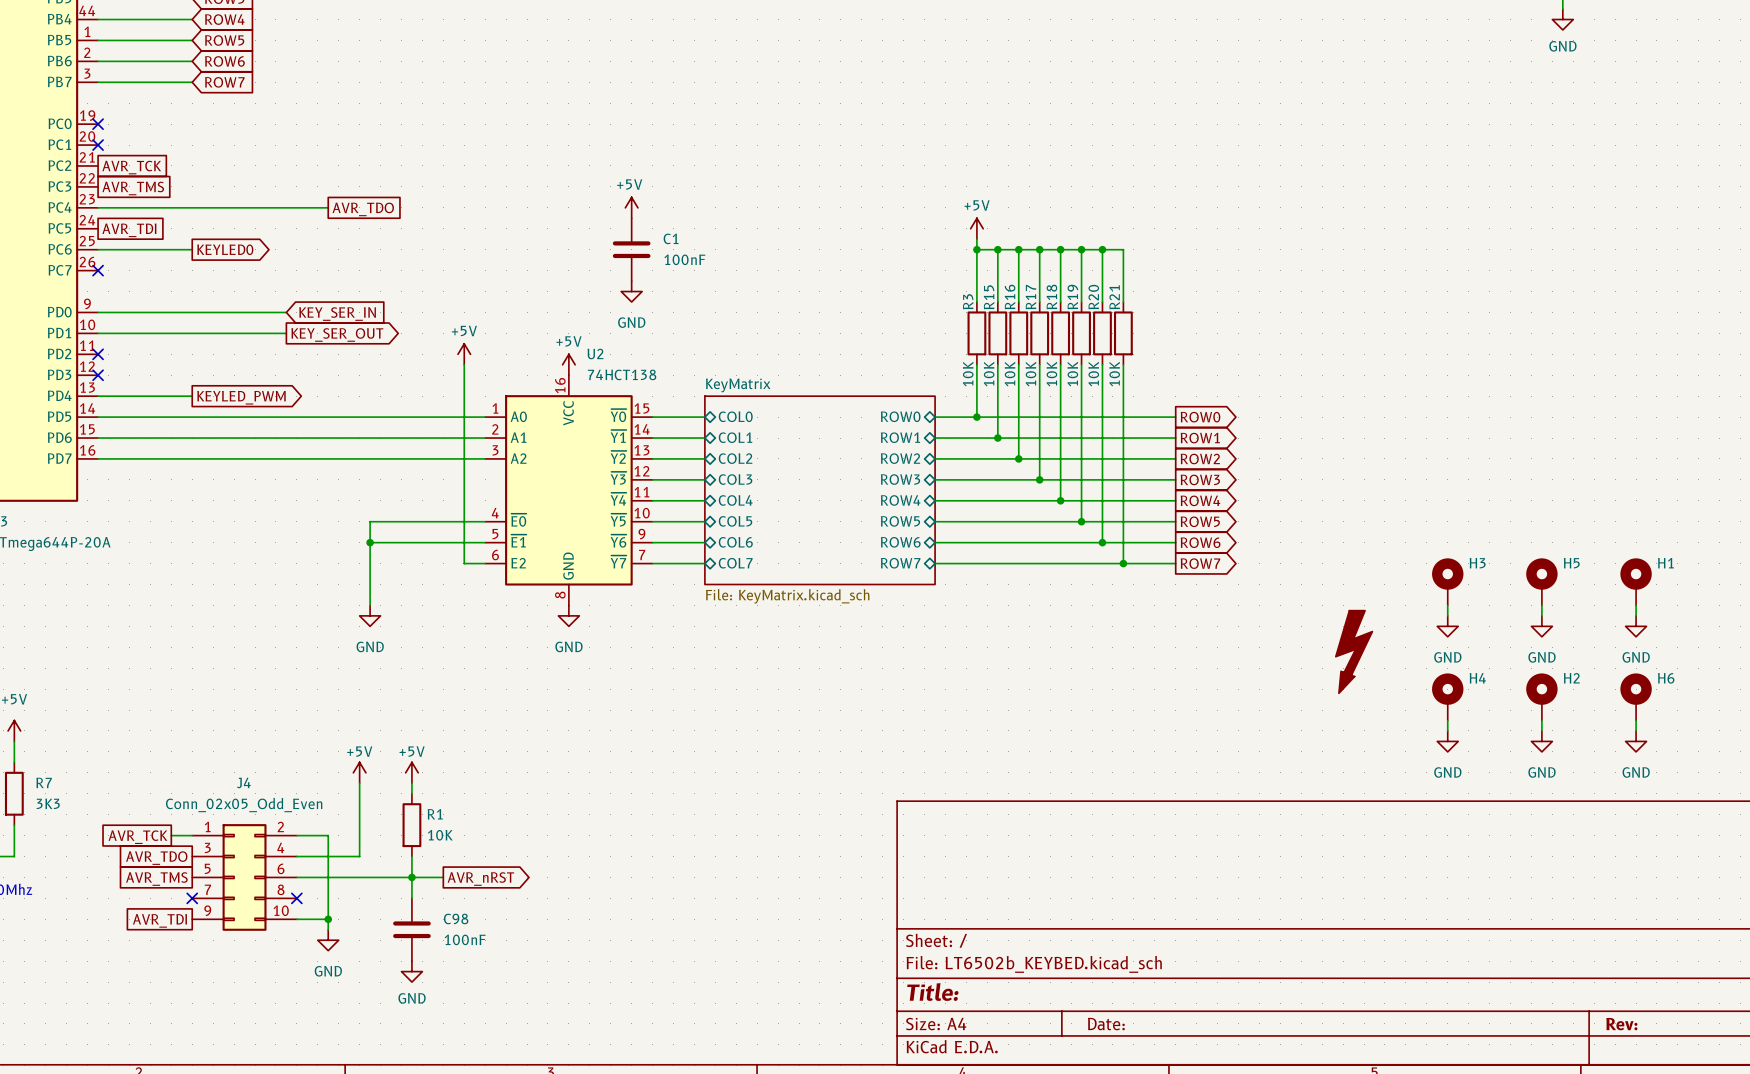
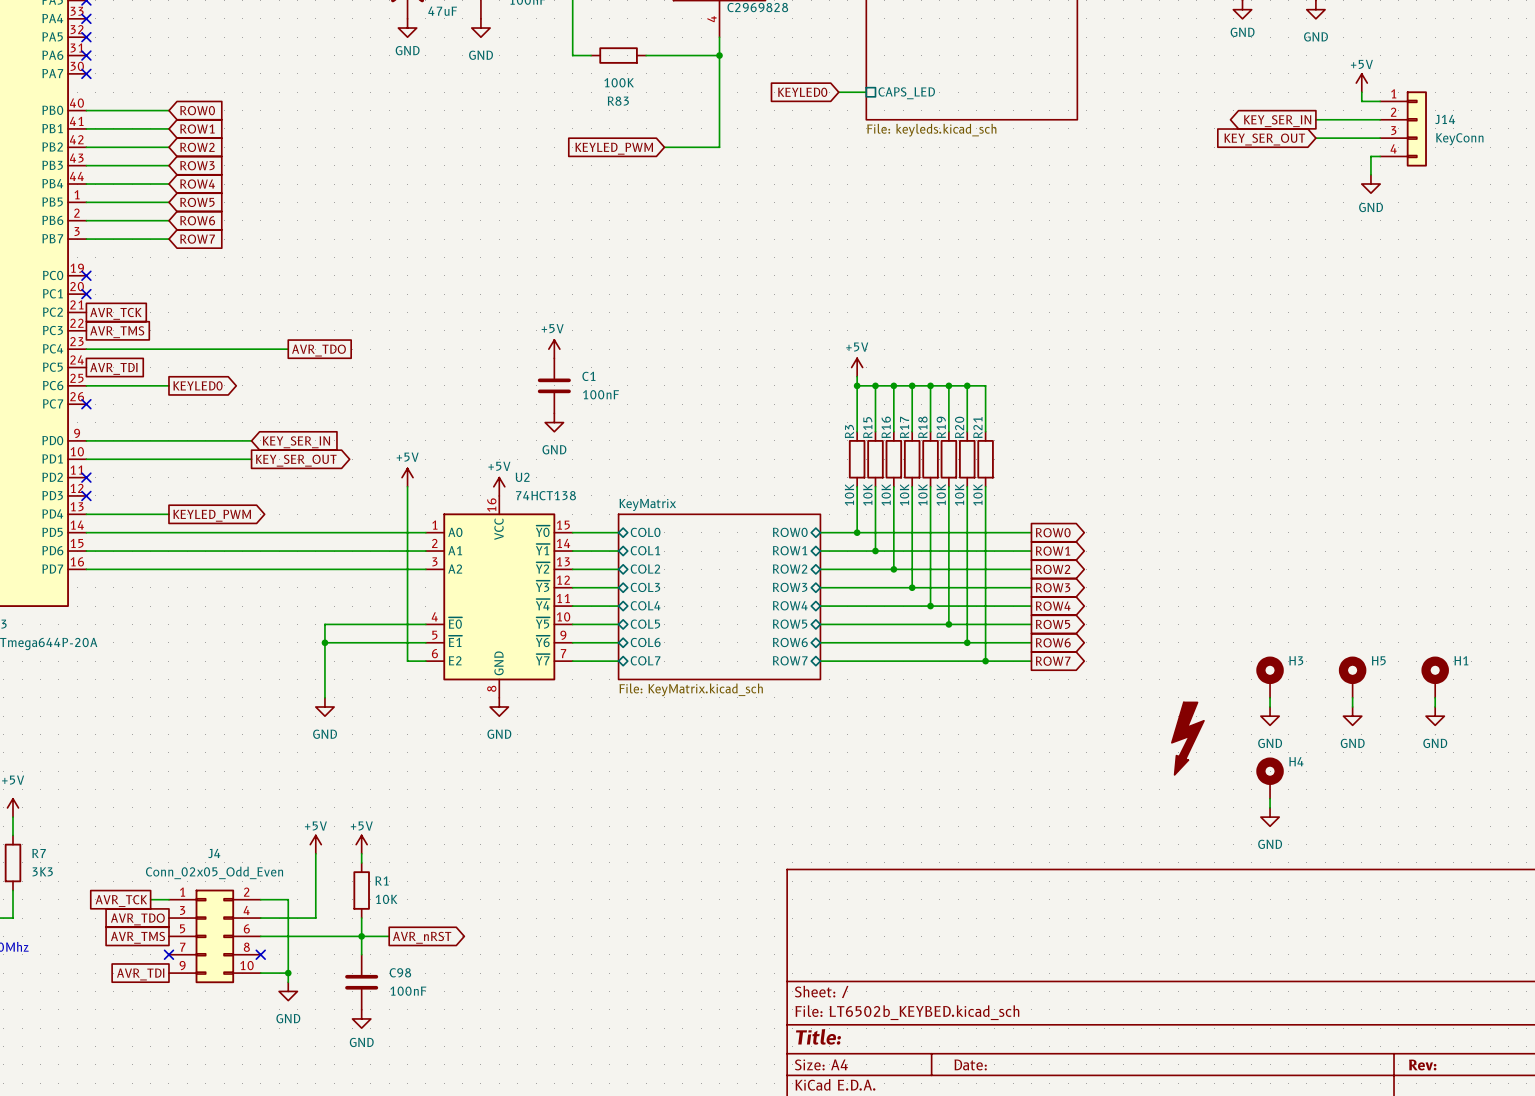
H2: (1541, 696) -> none
H6: (1636, 696) -> none
wire: (1541, 720) (1541, 730) -> none
wire: (1636, 720) (1636, 730) -> none
power symbol: GND (1541, 741) -> none
power symbol: GND (1636, 741) -> none

